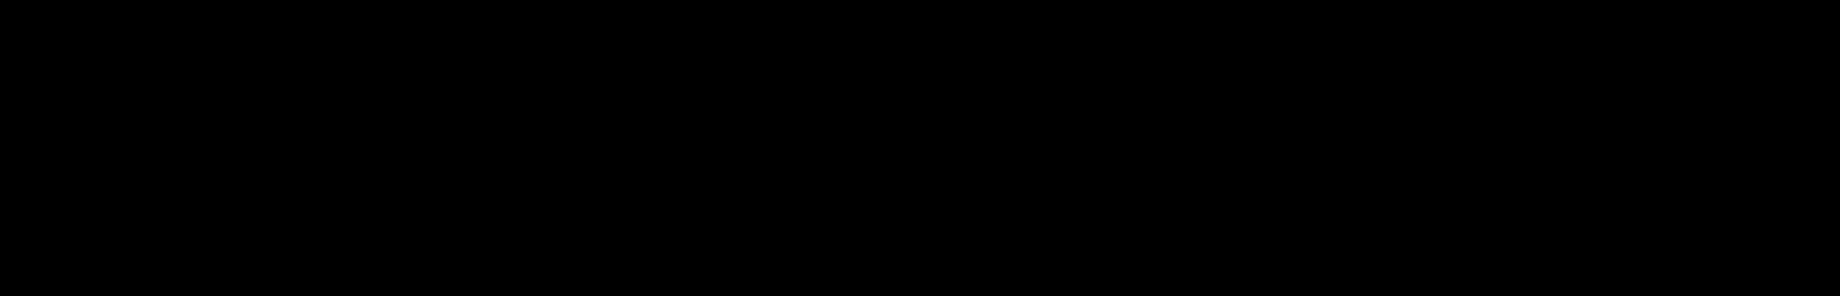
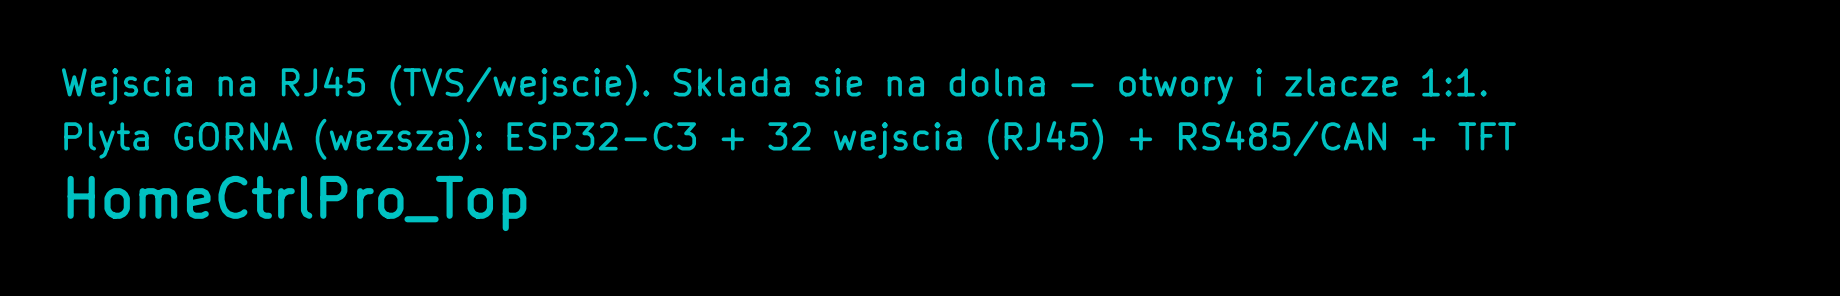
text: none -> Wejscia na RJ45 (TVS/wejscie). Sklada sie na dolna - otwory i zlacze 1:1. (774, 85)
text: none -> Plyta GORNA (wezsza): ESP32-C3 + 32 wejscia (RJ45) + RS485/CAN + TFT (790, 139)
text: none -> HomeCtrlPro_Top (296, 203)

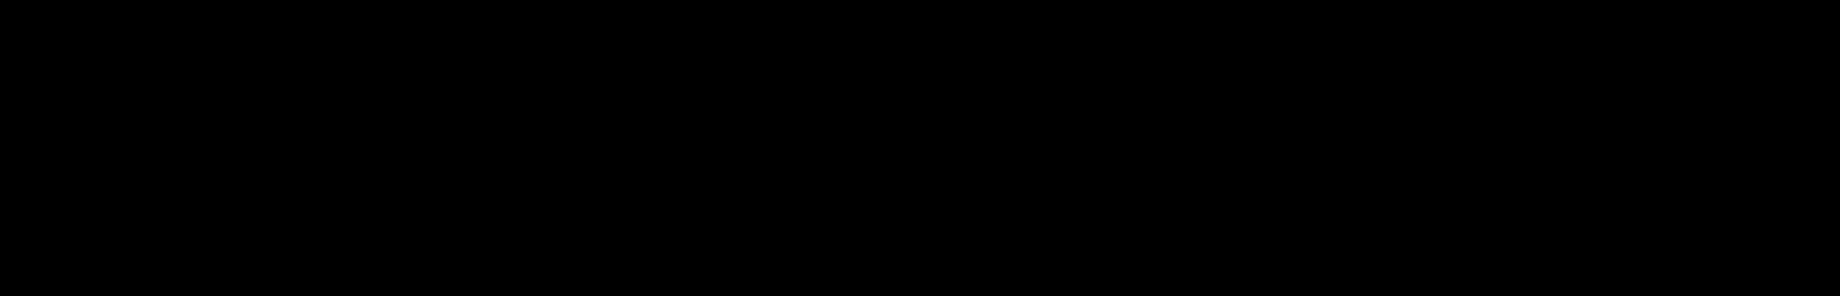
text: Wejscia na RJ45 (TVS/wejscie). Sklada sie na dolna - otwory i zlacze 1:1. (774, 85) -> none
text: Plyta GORNA (wezsza): ESP32-C3 + 32 wejscia (RJ45) + RS485/CAN + TFT (790, 139) -> none
text: HomeCtrlPro_Top (296, 203) -> none

